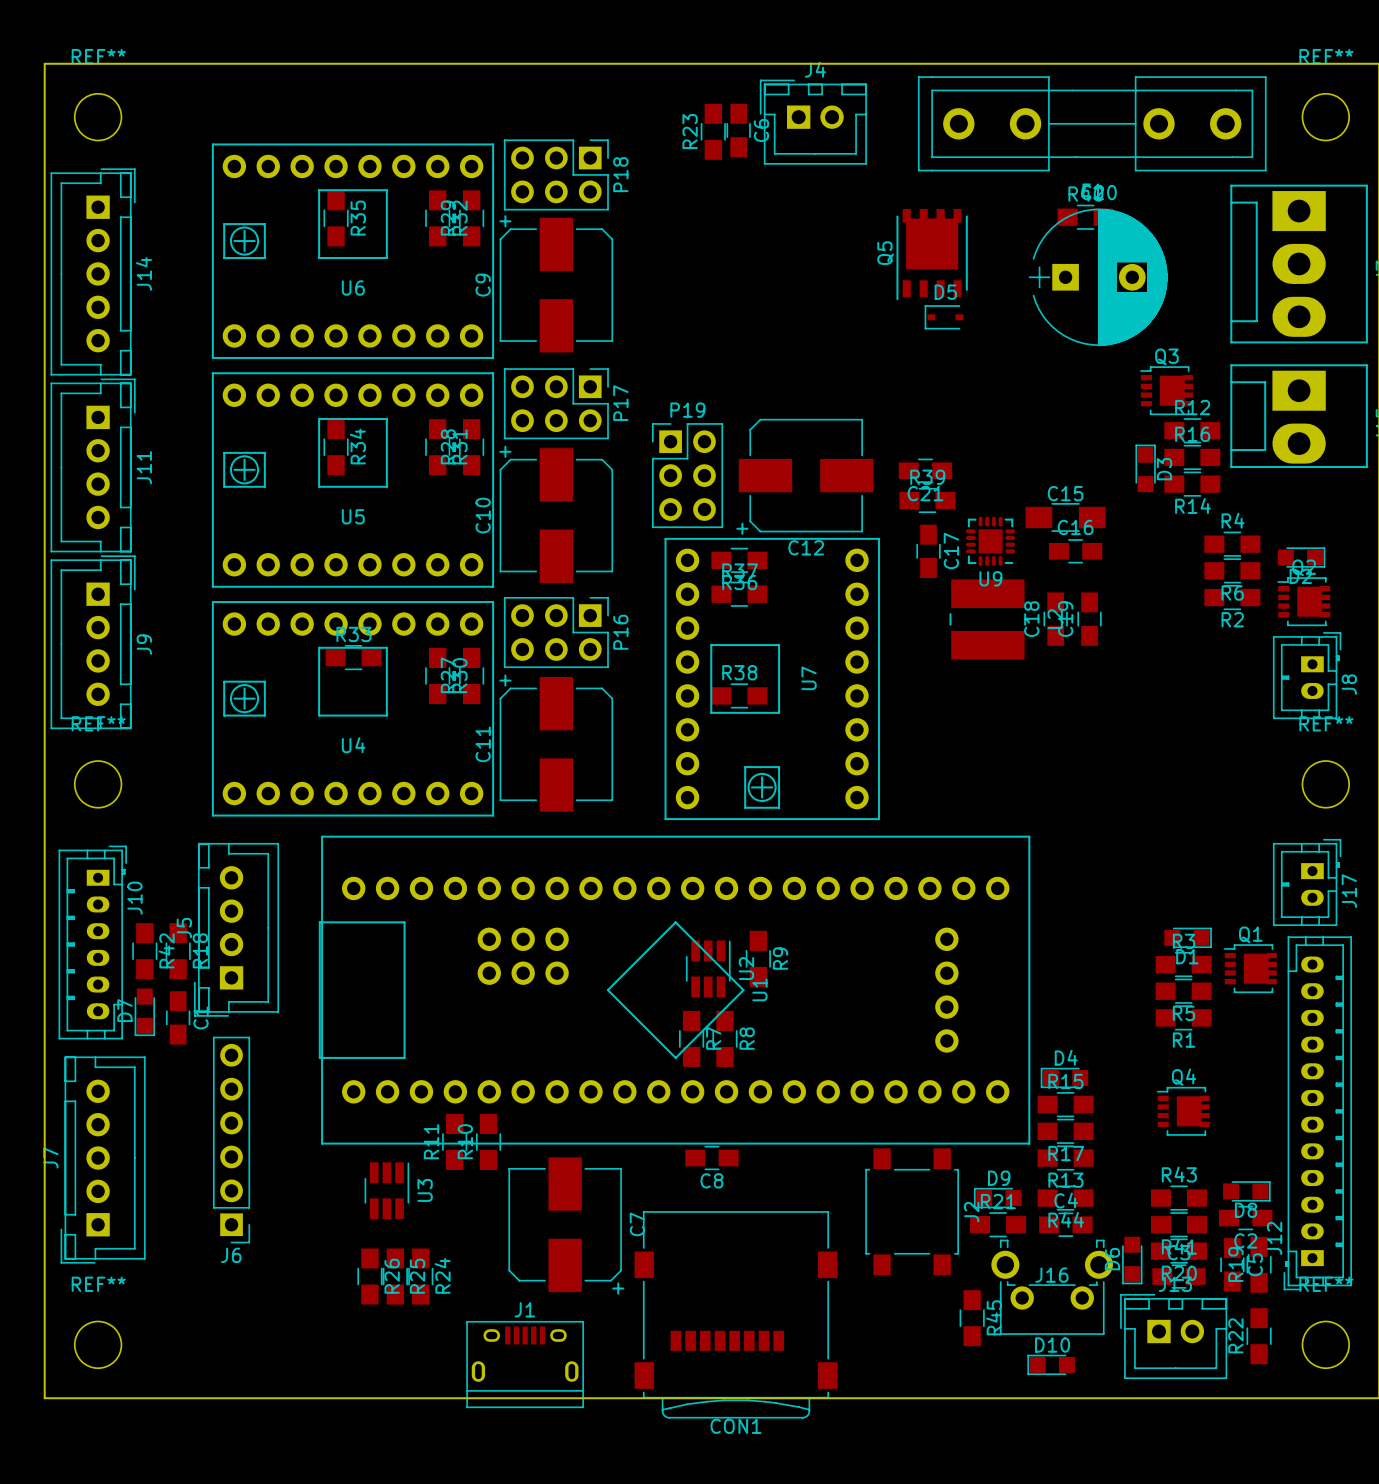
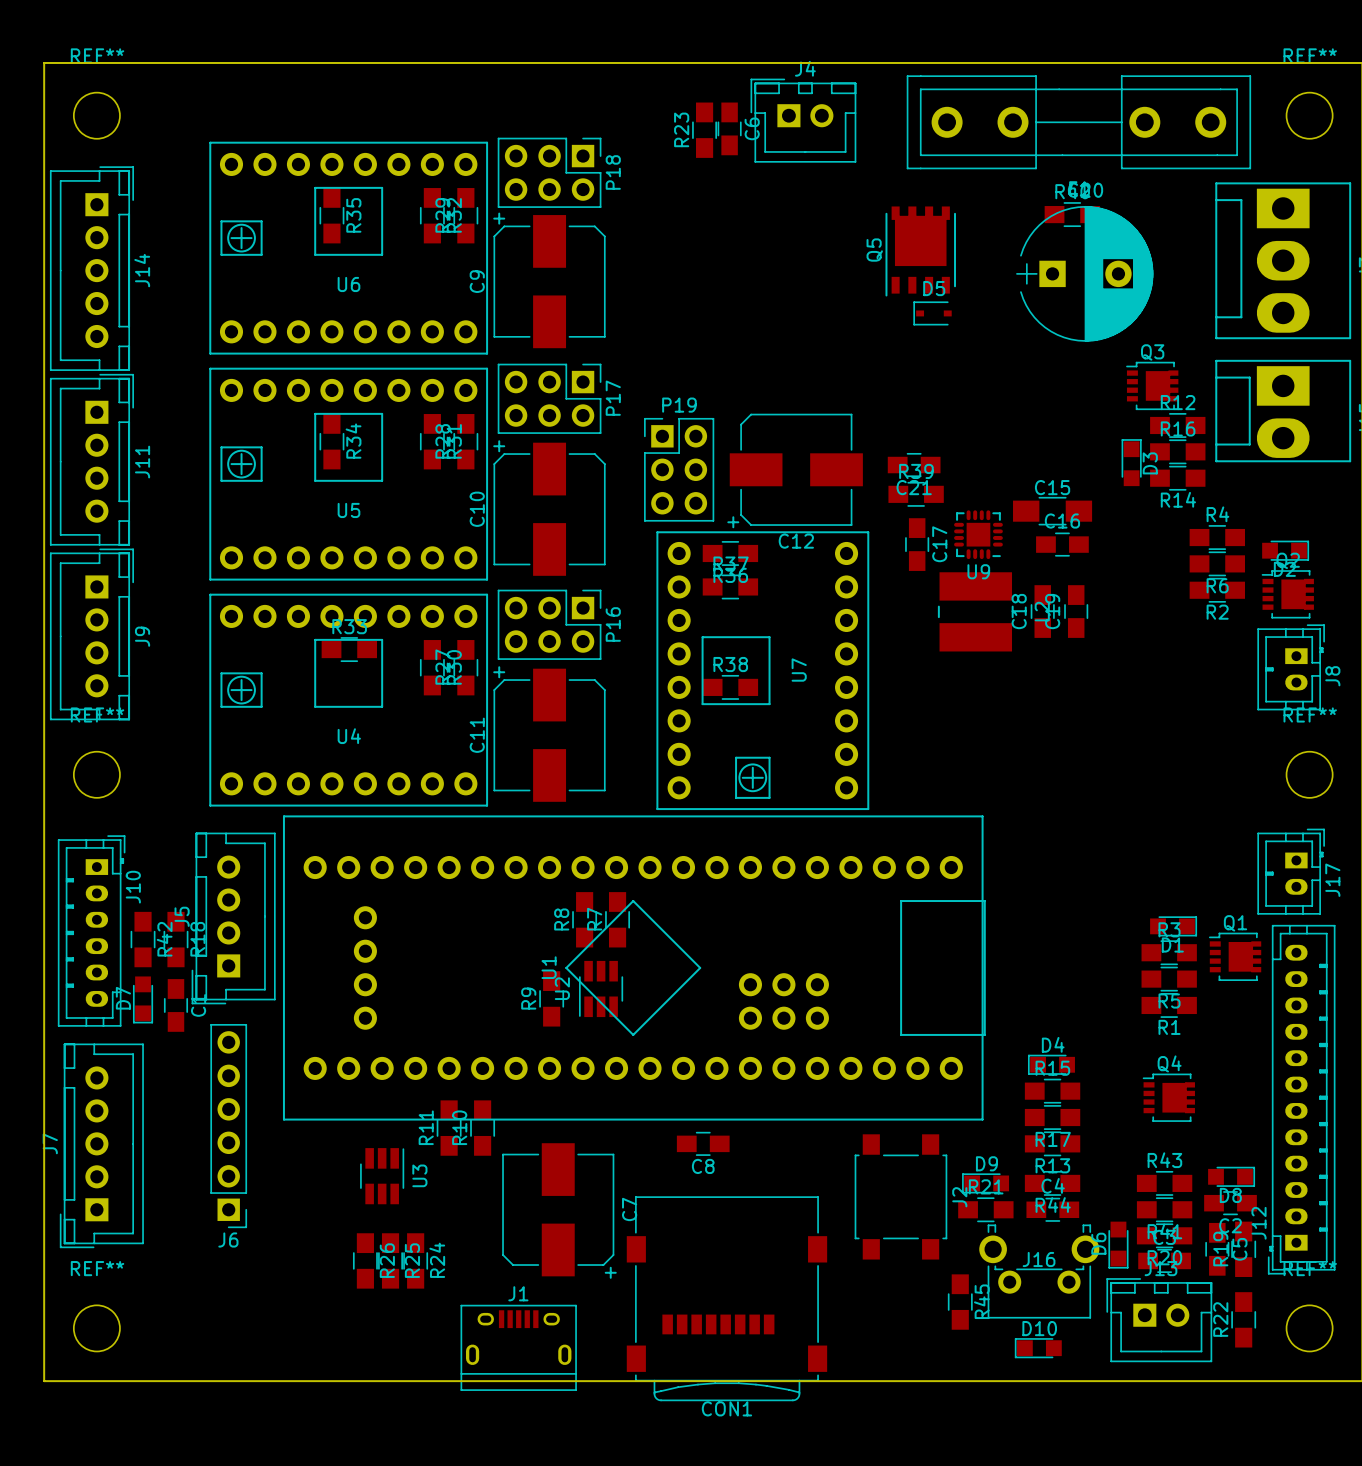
R9 position: (758, 958) -> (551, 998)
R9 name position: R9 (780, 958) -> R9 (528, 998)
U2 rotation: 0° (708, 968) -> 180° (601, 988)
U2 position: (708, 968) -> (601, 988)
U1 rotation: 0° (674, 990) -> 180° (634, 967)
R7 position: (691, 1038) -> (617, 919)
R7 name position: R7 (713, 1038) -> R7 (594, 919)
R8 position: (724, 1038) -> (584, 919)
R8 name position: R8 (747, 1038) -> R8 (561, 919)

